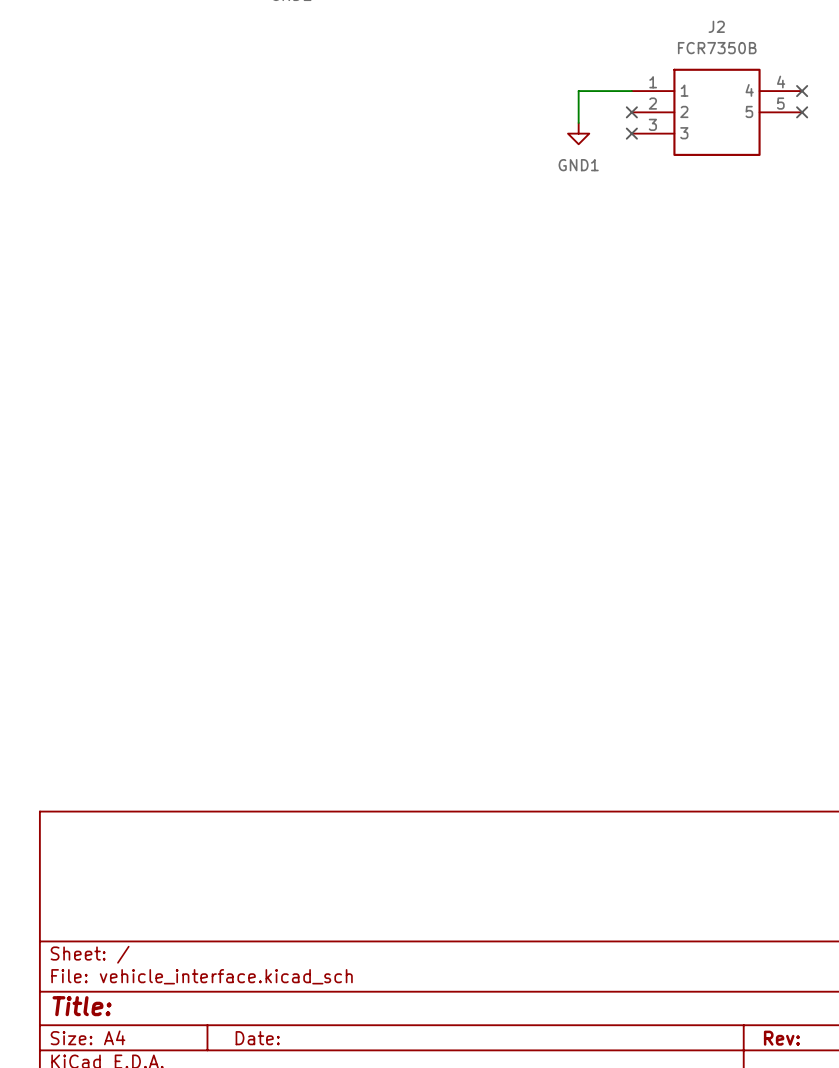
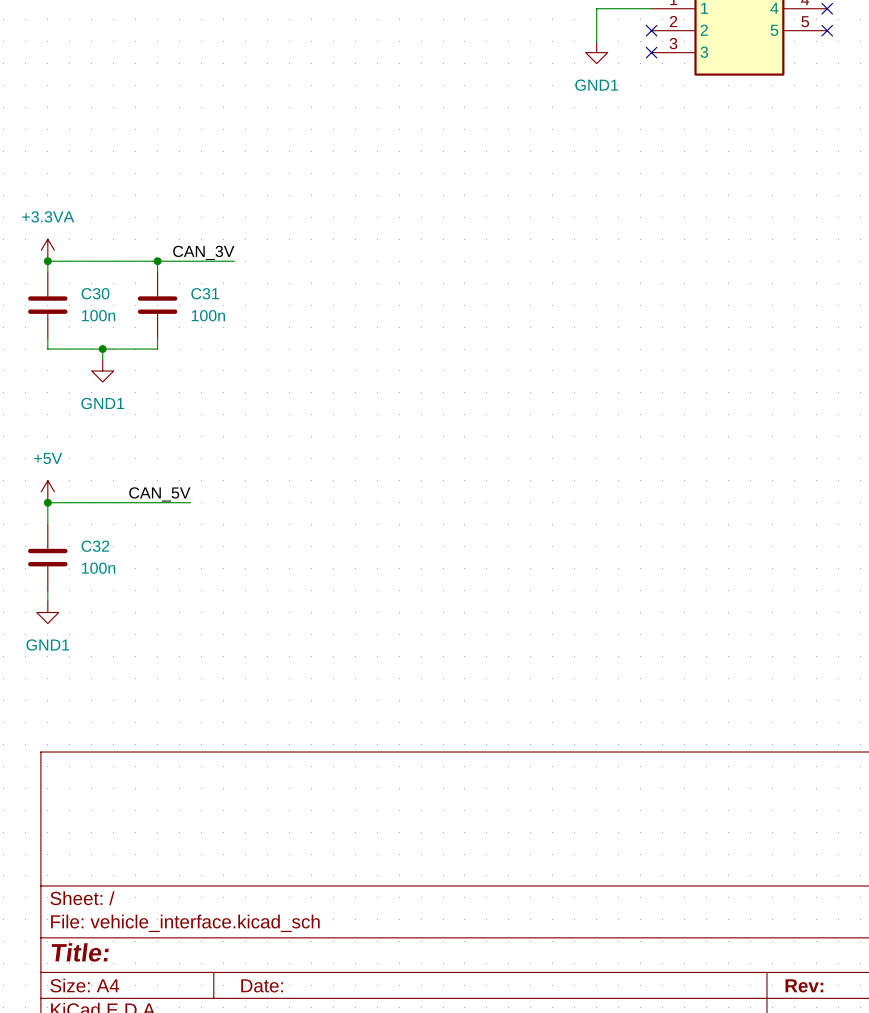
power symbol: none -> +3.3VA (47, 250)
label: none -> CAN_3V (203, 252)
junction: none -> (47, 261)
wire: none -> (157, 261) (157, 272)
junction: none -> (157, 261)
wire: none -> (234, 261) (47, 261) (47, 272)
C30: none -> 100n (47, 305)
C31: none -> 100n (157, 305)
wire: none -> (47, 338) (47, 349) (157, 349) (157, 338)
wire: none -> (102, 349) (102, 360)
junction: none -> (102, 349)
power symbol: none -> GND1 (102, 370)
power symbol: none -> +5V (47, 491)
label: none -> CAN_5V (159, 494)
junction: none -> (47, 502)
wire: none -> (190, 502) (47, 502) (47, 524)
C32: none -> 100n (47, 557)
wire: none -> (47, 590) (47, 601)
power symbol: none -> GND1 (47, 612)

